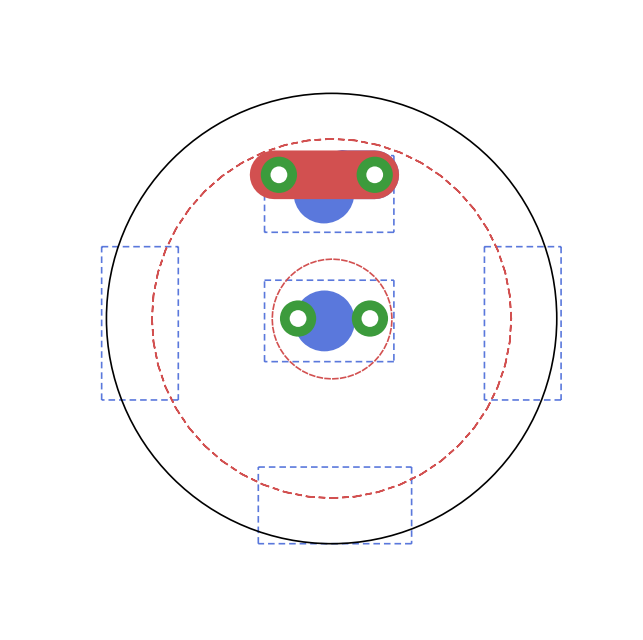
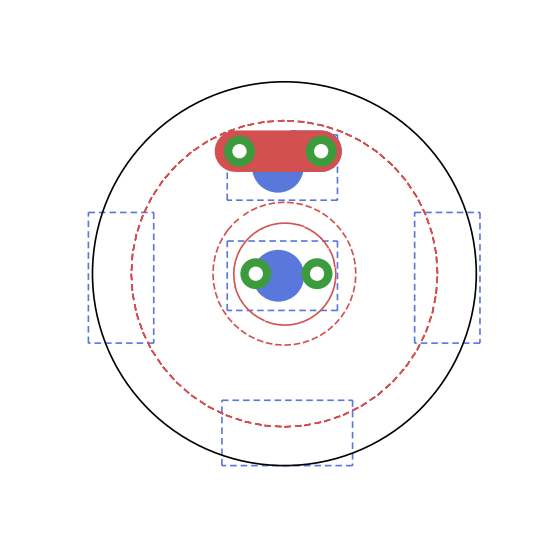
top zone outline: none -> (284, 202) (311, 207) (334, 223) (350, 246) (355, 273) (350, 301) (334, 324) (311, 339) (284, 345) (257, 339) (233, 324) (218, 301) (212, 273) (218, 246) (233, 223) (257, 207) (284, 202)

